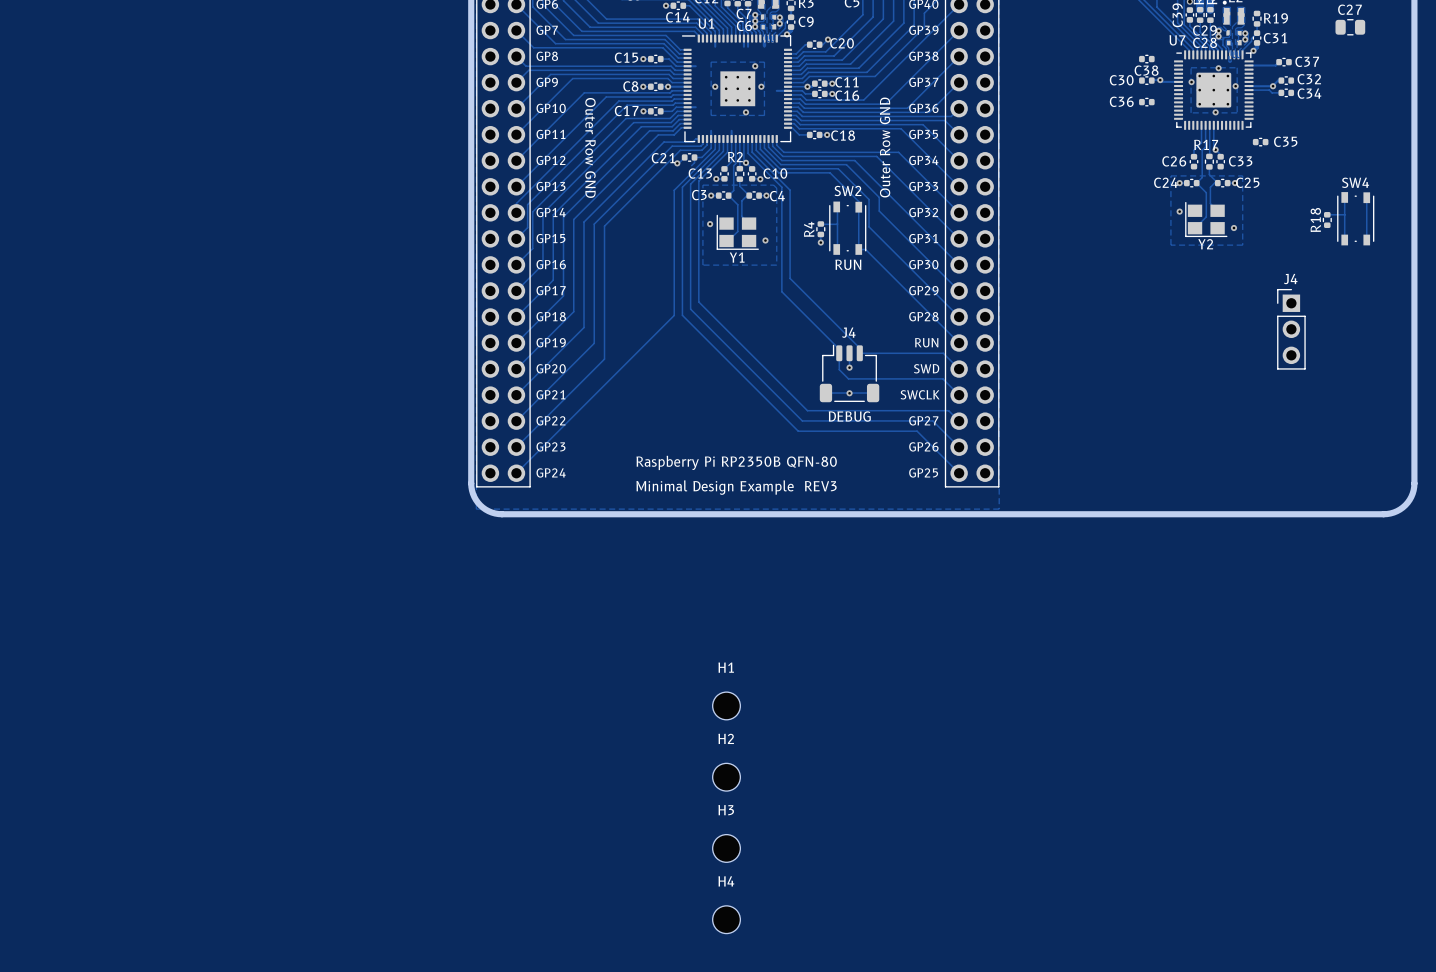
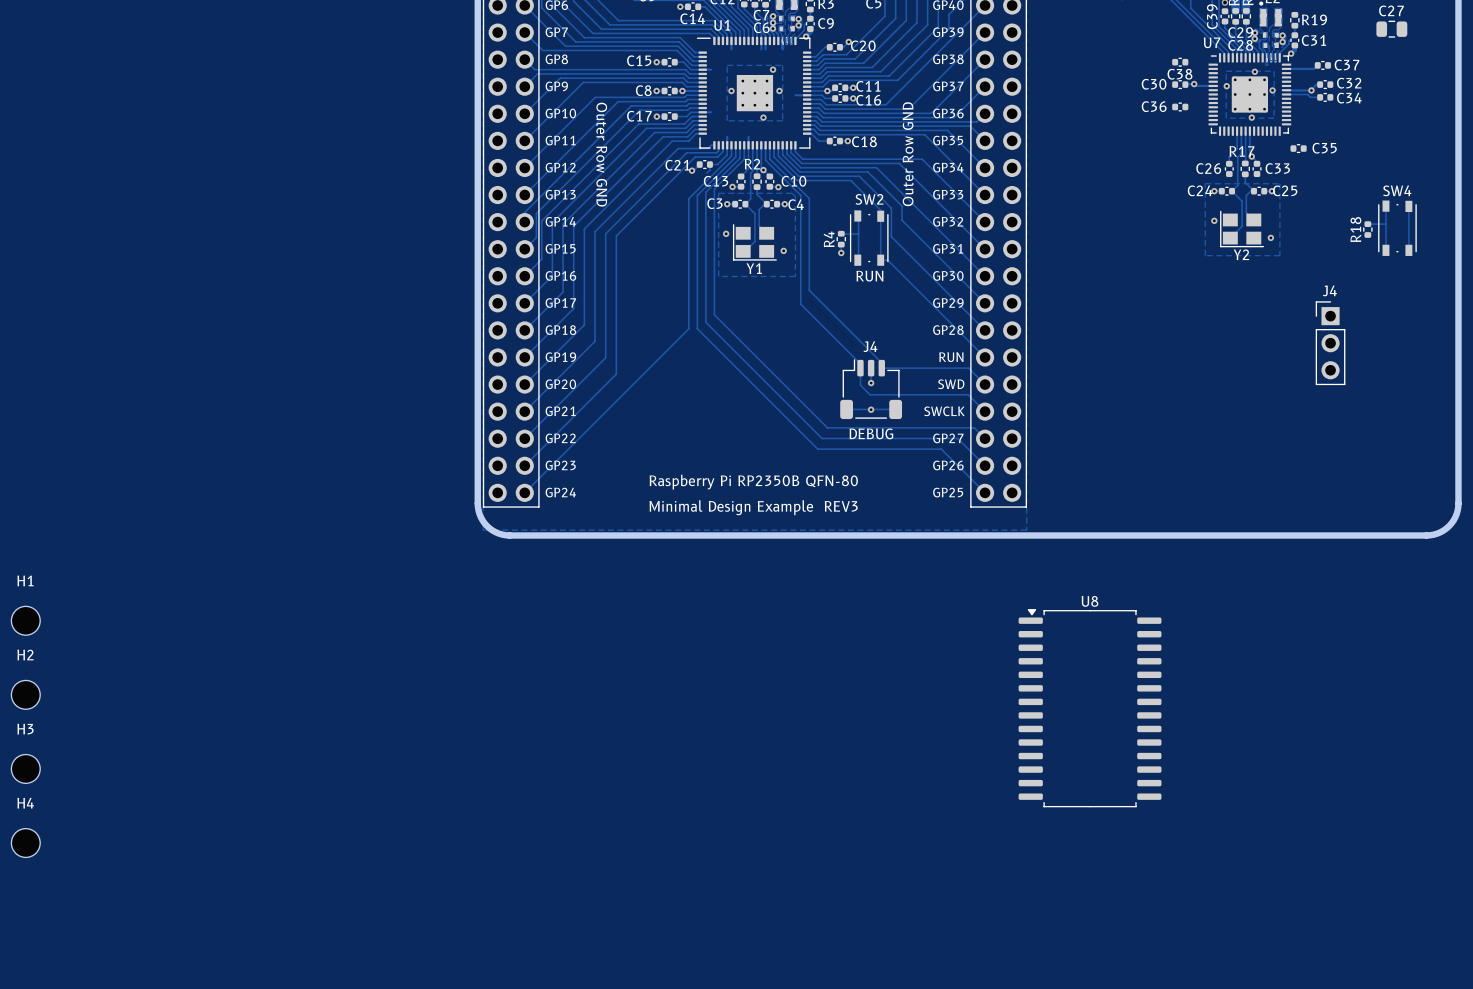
U8: none -> (1090, 708)
H1 position: (726, 705) -> (25, 620)
H2 position: (726, 777) -> (25, 694)
H3 position: (726, 848) -> (25, 768)
H4 position: (726, 919) -> (25, 843)

